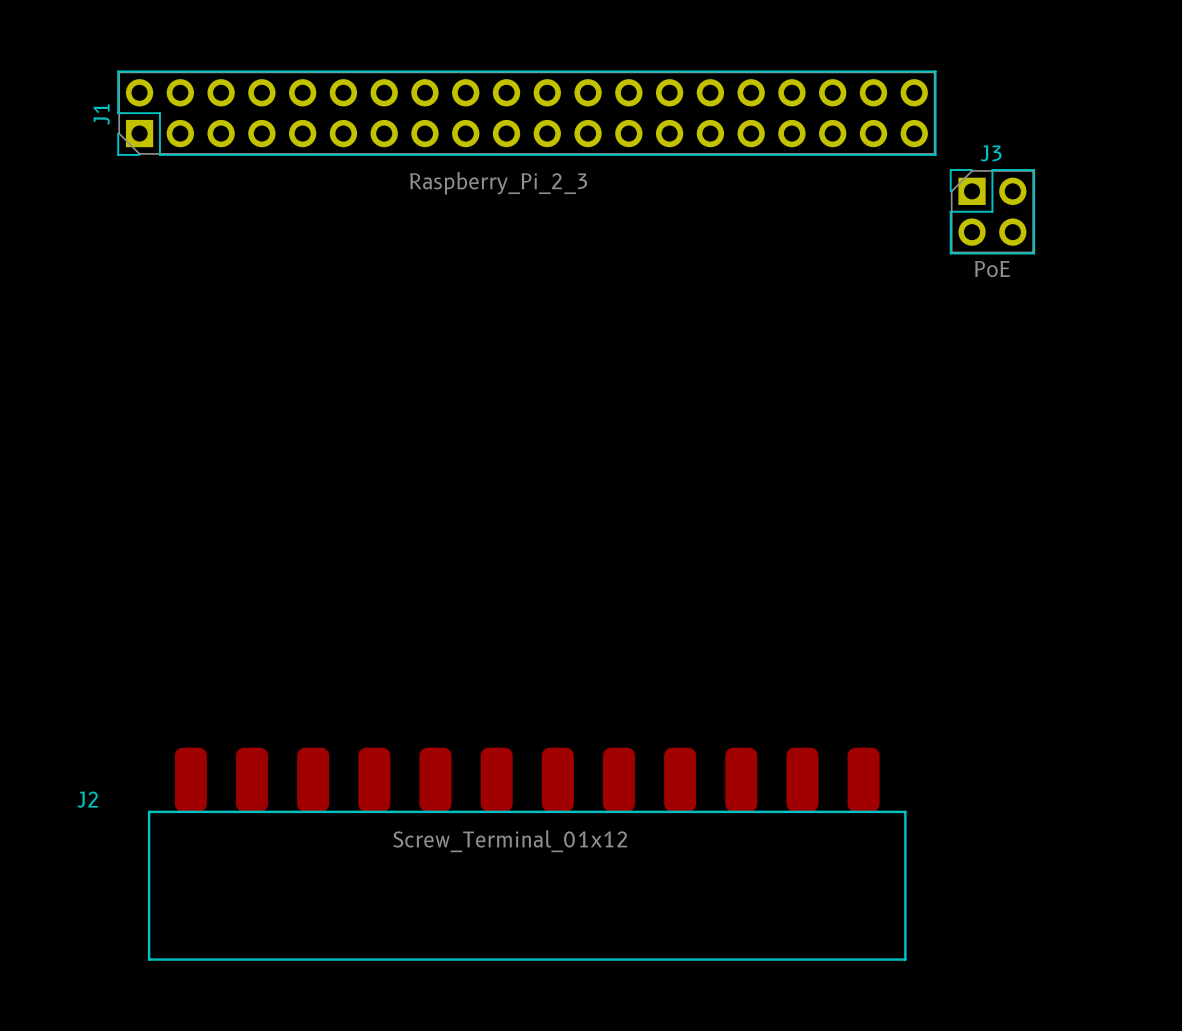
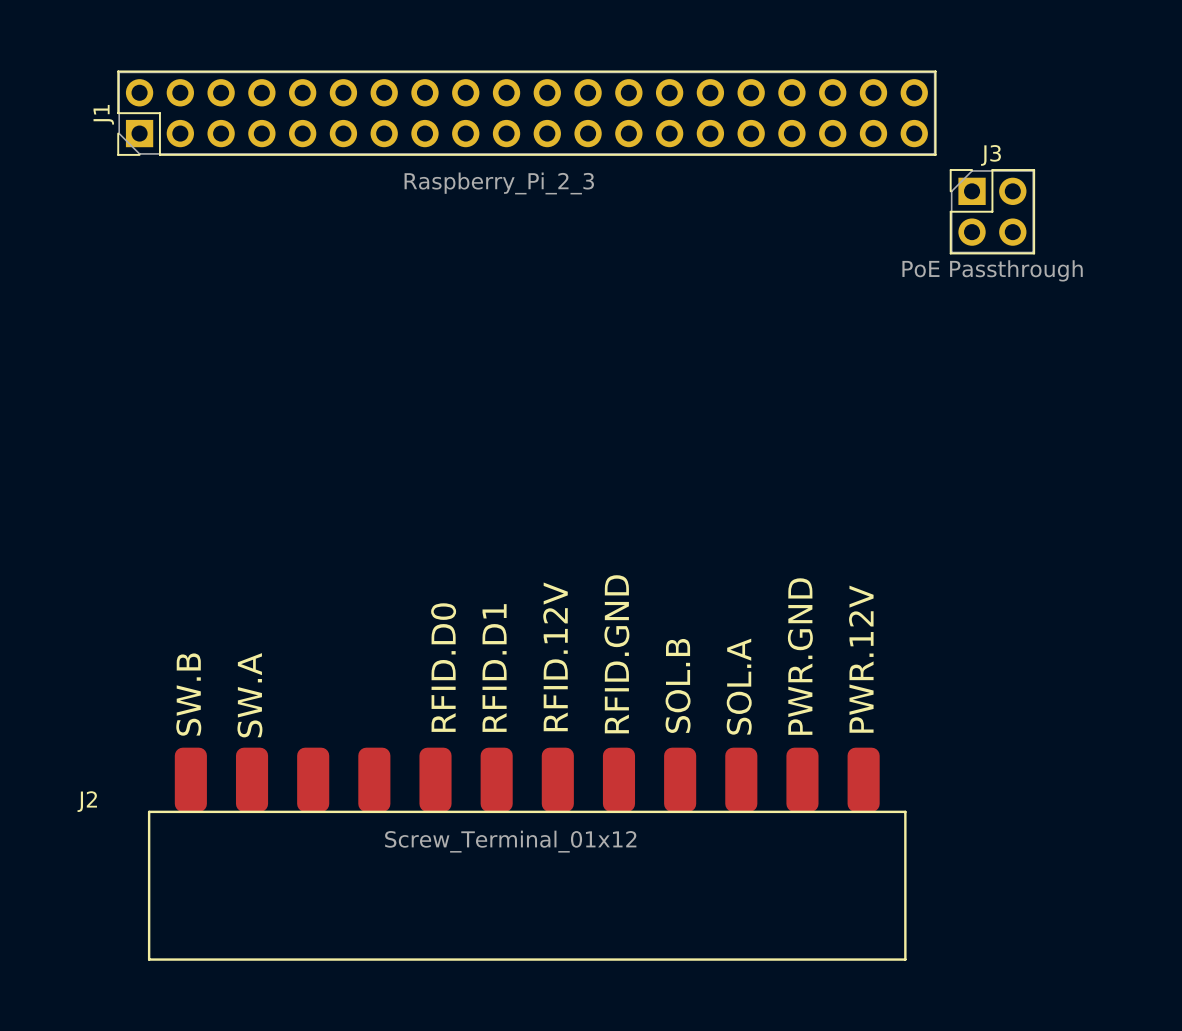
J3 value: PoE (992, 269) -> PoE Passthrough (992, 270)
text: none -> RFID.GND (616, 654)
text: none -> PWR.GND (800, 656)
text: none -> RFID.12V (555, 656)
text: none -> PWR.12V (861, 659)
text: none -> RFID.D0 (443, 667)
text: none -> RFID.D1 (494, 668)
text: none -> SOL.B (678, 685)
text: none -> SOL.A (739, 686)
text: none -> SW.B (188, 694)
text: none -> SW.A (249, 695)

